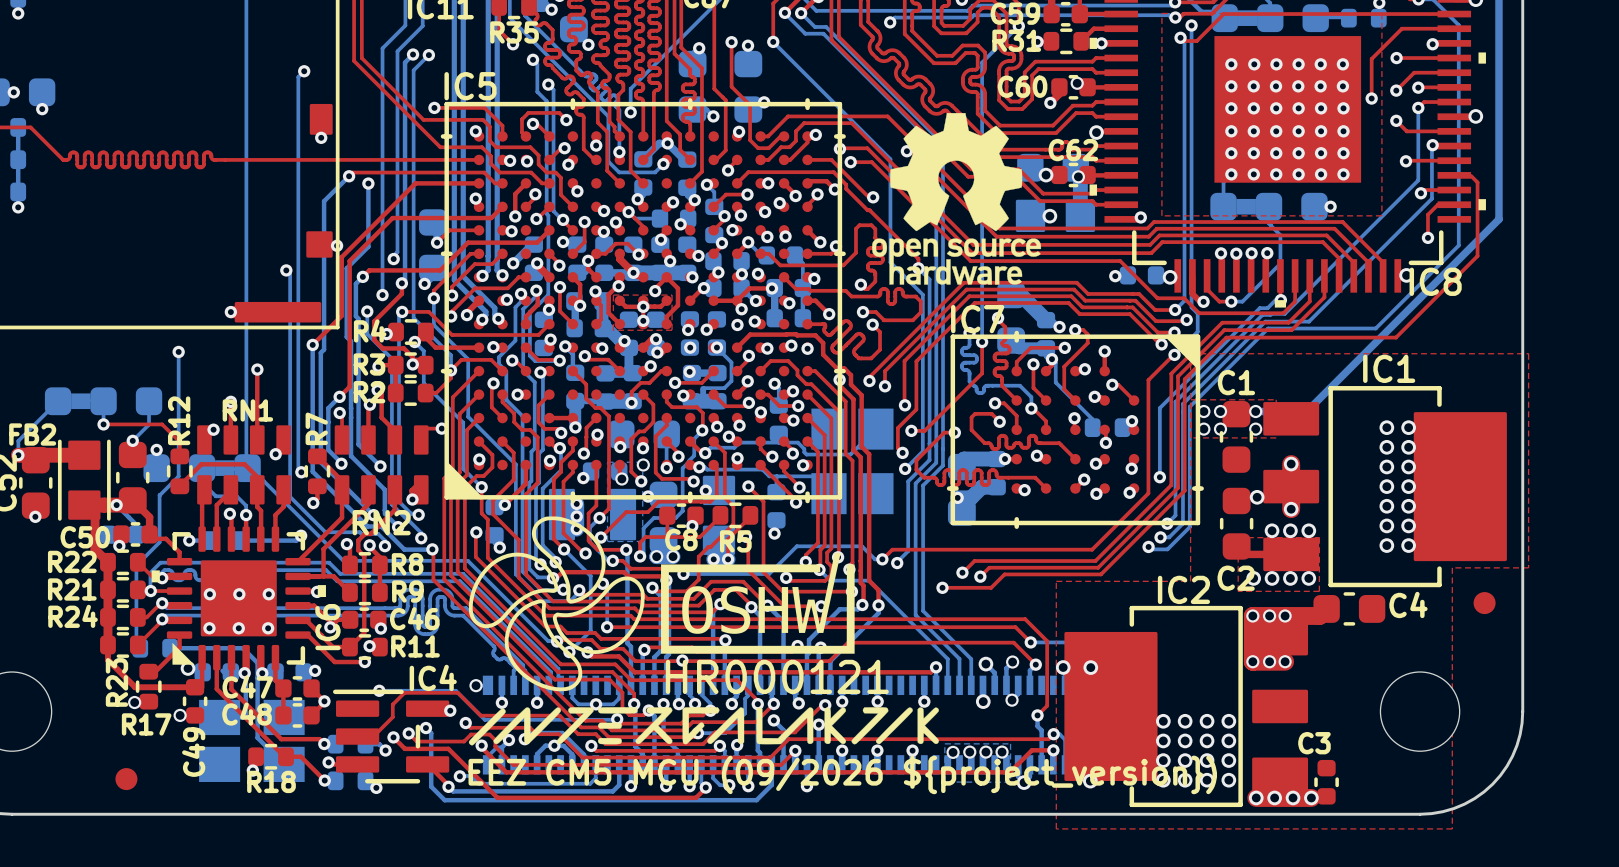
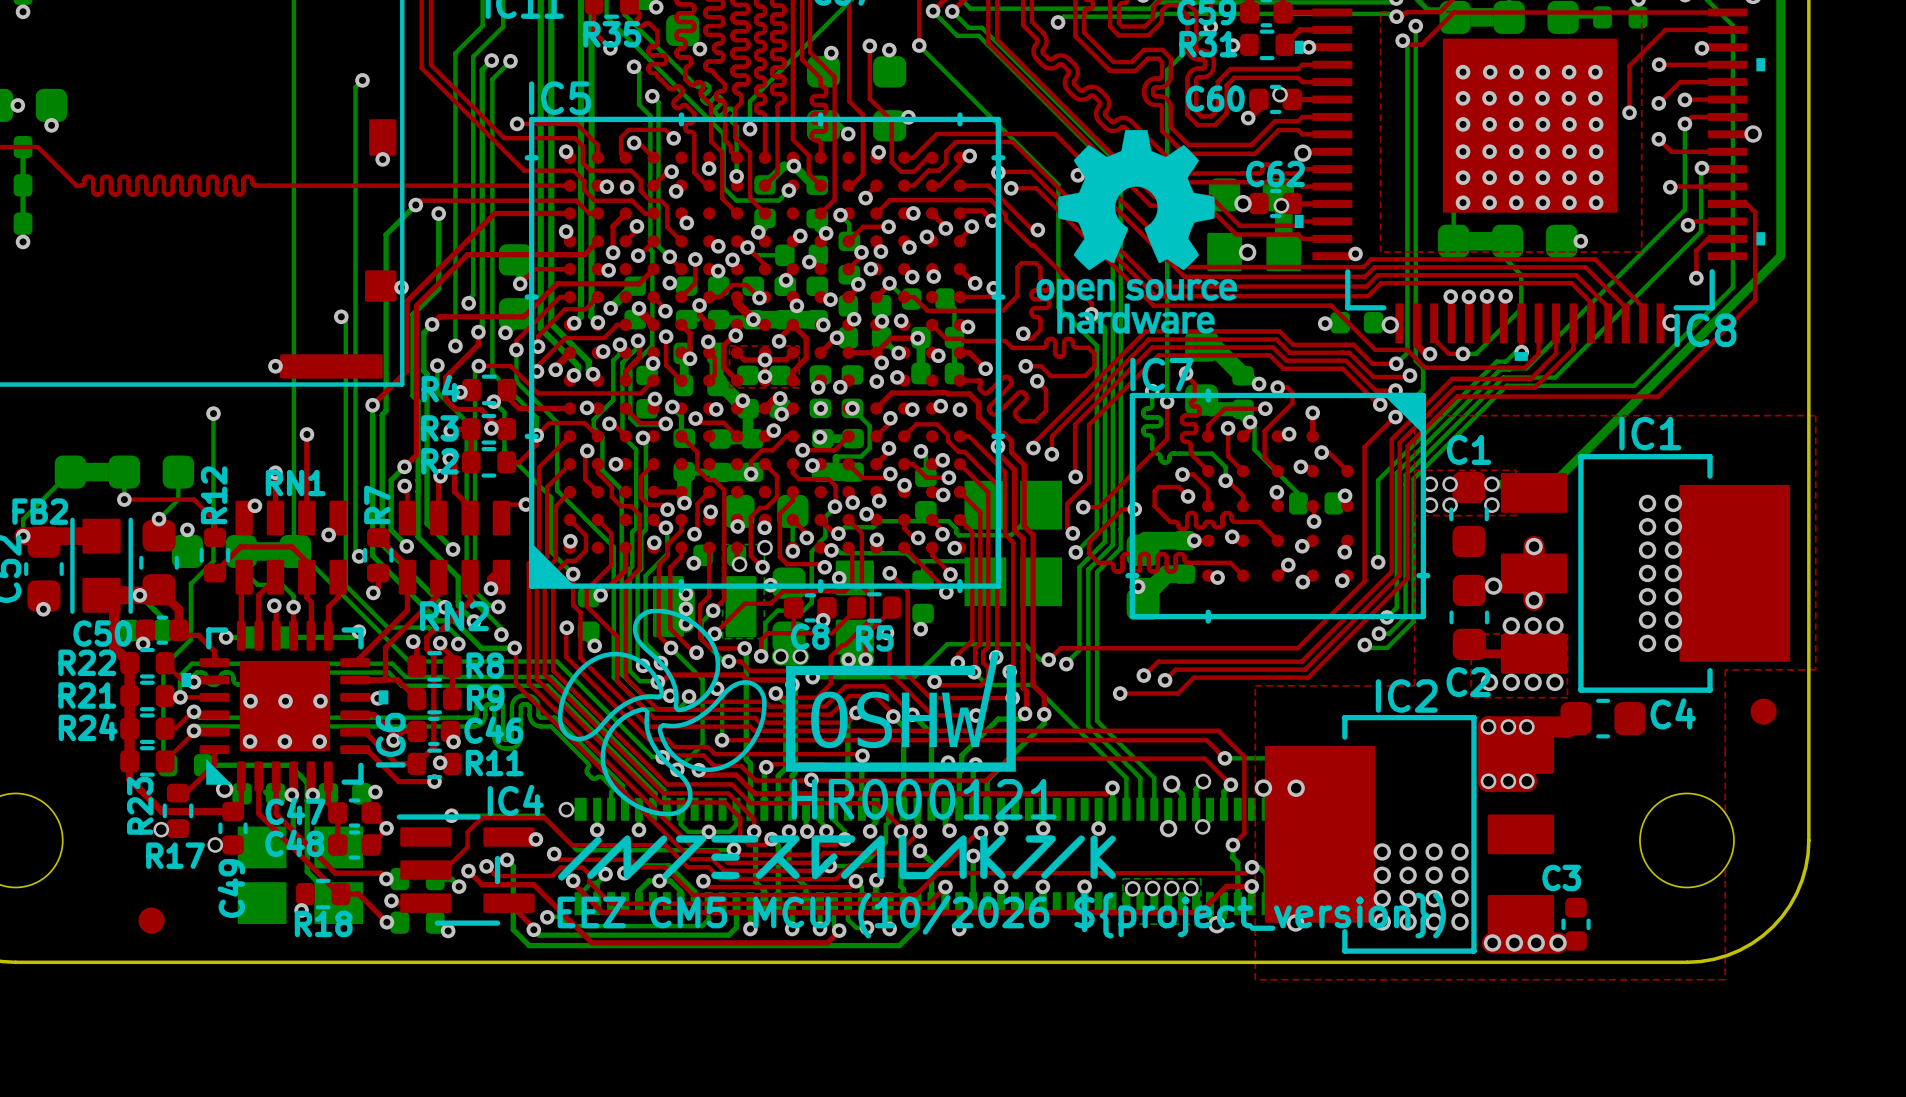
text: EEZ CM5 MCU (09/2026 ${project_version}) (842, 774) -> EEZ CM5 MCU (10/2026 ${project_version}) (1001, 915)

